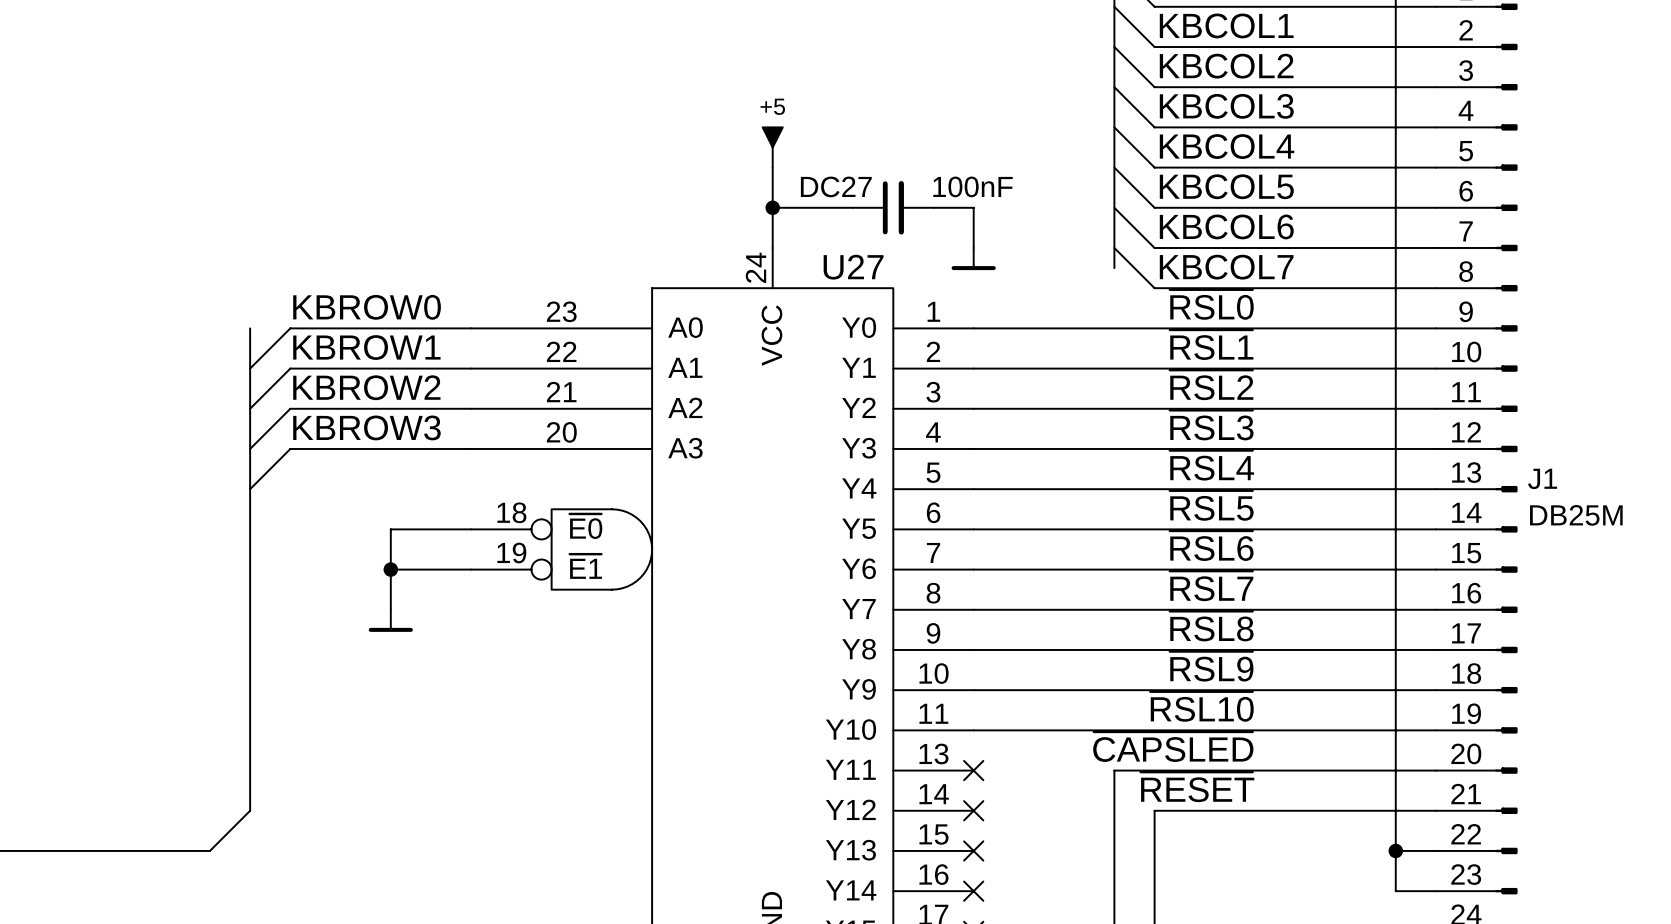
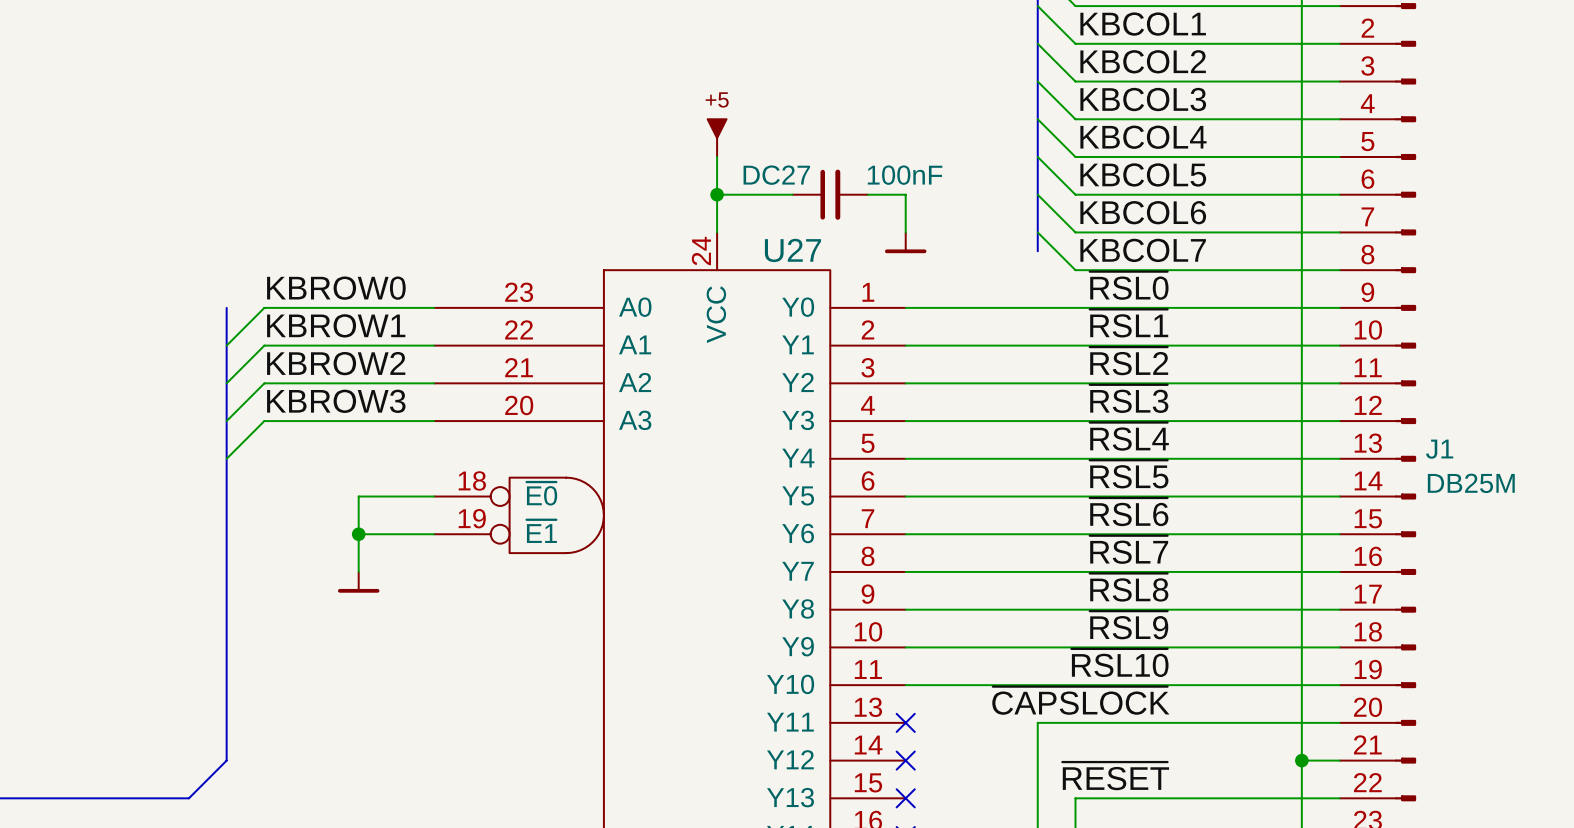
label: ~{CAPSLED} (1173, 746) -> ~{CAPSLOCK} (1080, 700)
label position: ~{RESET} (1197, 787) -> ~{RESET} (1115, 776)
wire: (1395, 810) (1154, 810) (1154, 850) -> (1301, 798) (1075, 798)
junction position: (1395, 850) -> (1301, 760)

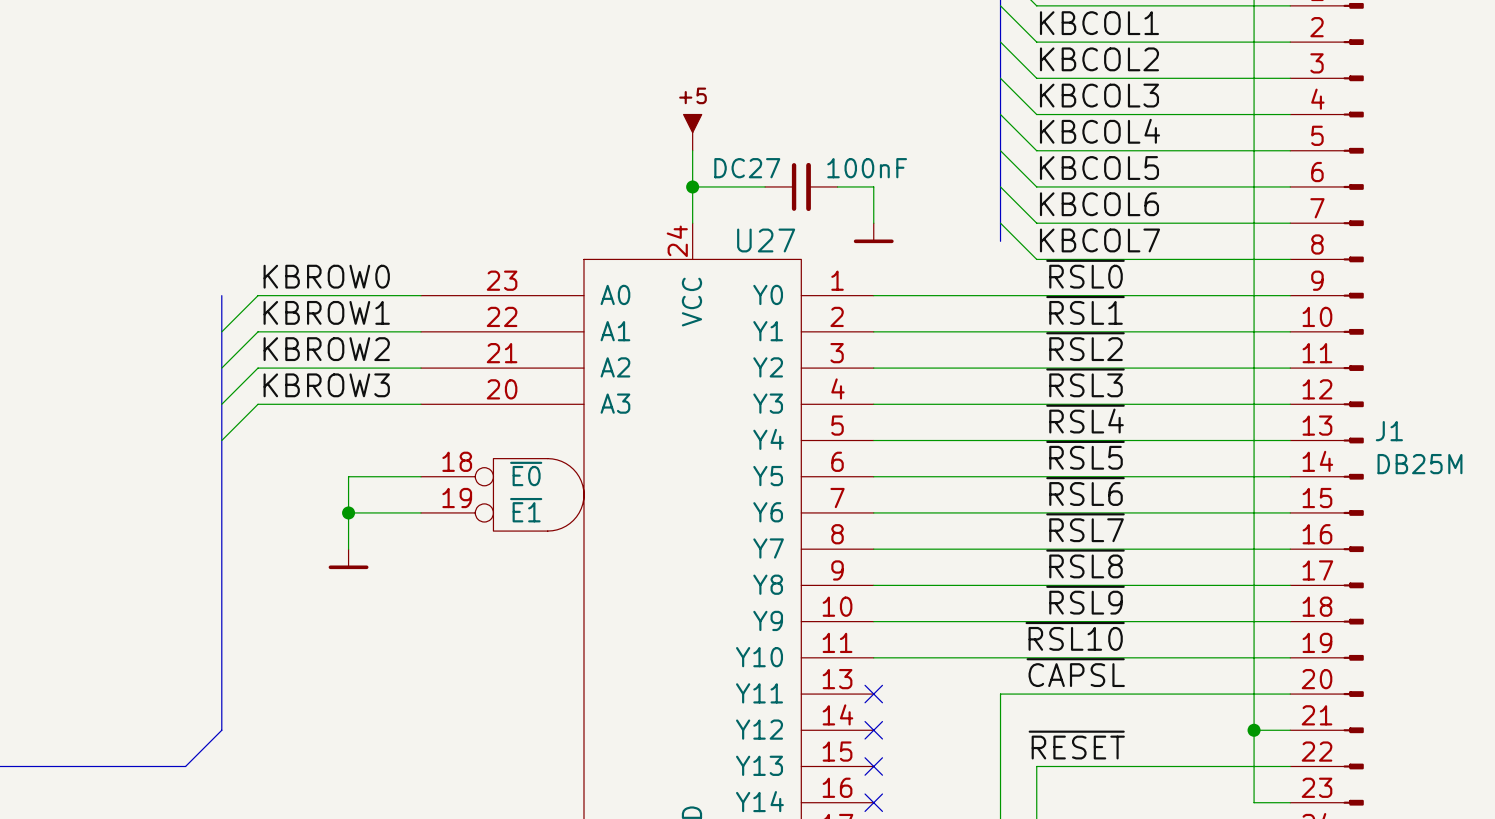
label: ~{CAPSLOCK} (1080, 700) -> ~{CAPSL} (1075, 672)

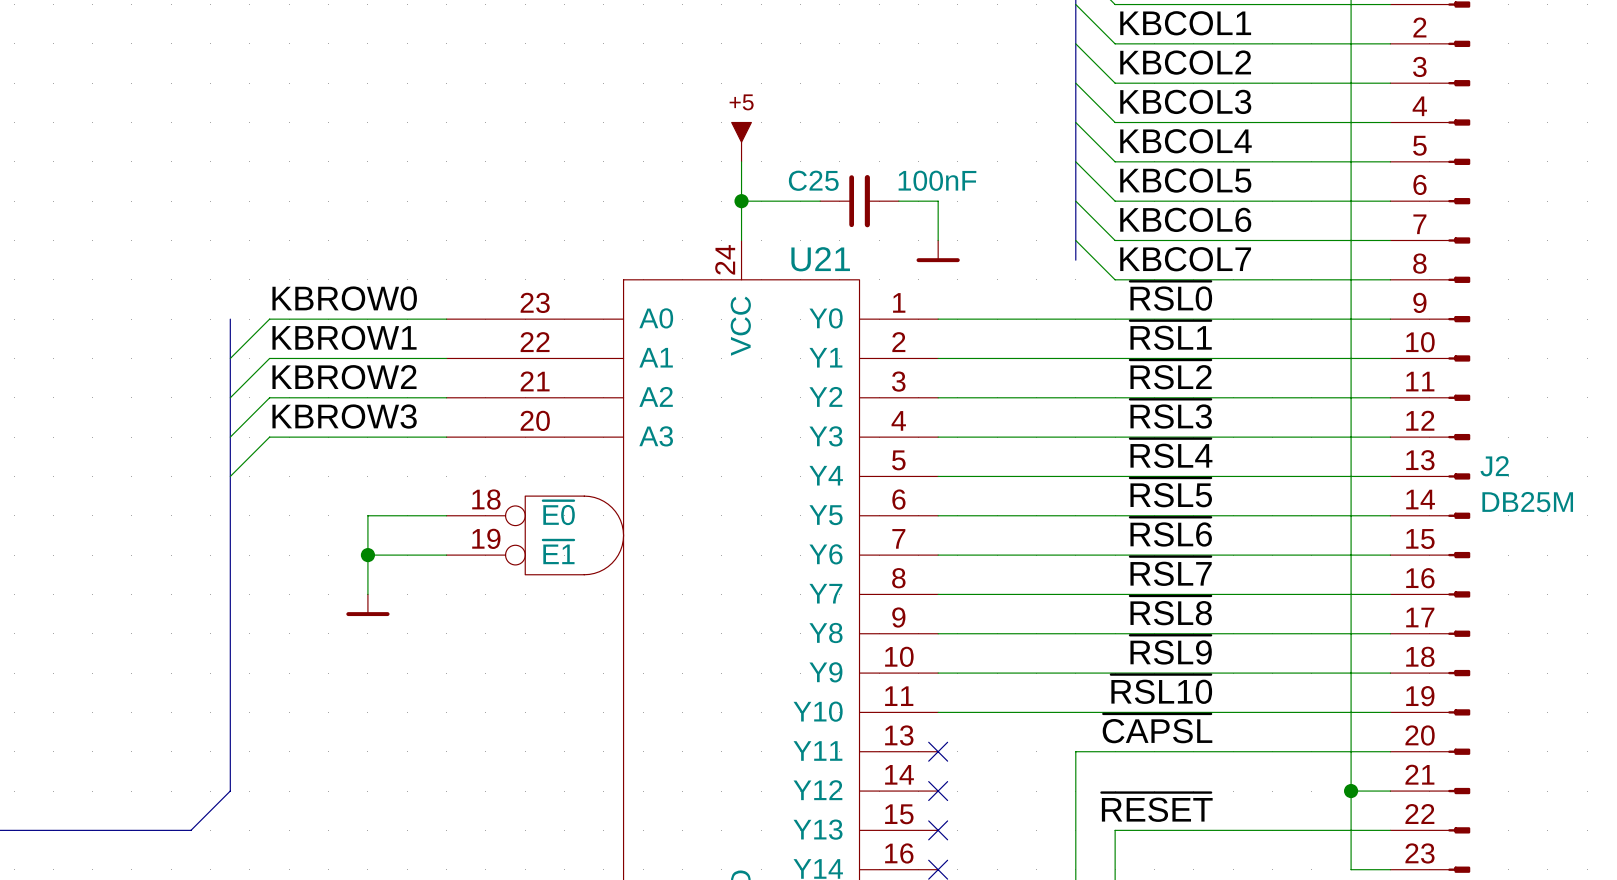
DC27 name: DC27 (747, 168) -> C25 (813, 180)
U27 name: U27 (766, 240) -> U21 (820, 259)
J1 name: J1 (1389, 431) -> J2 (1494, 466)

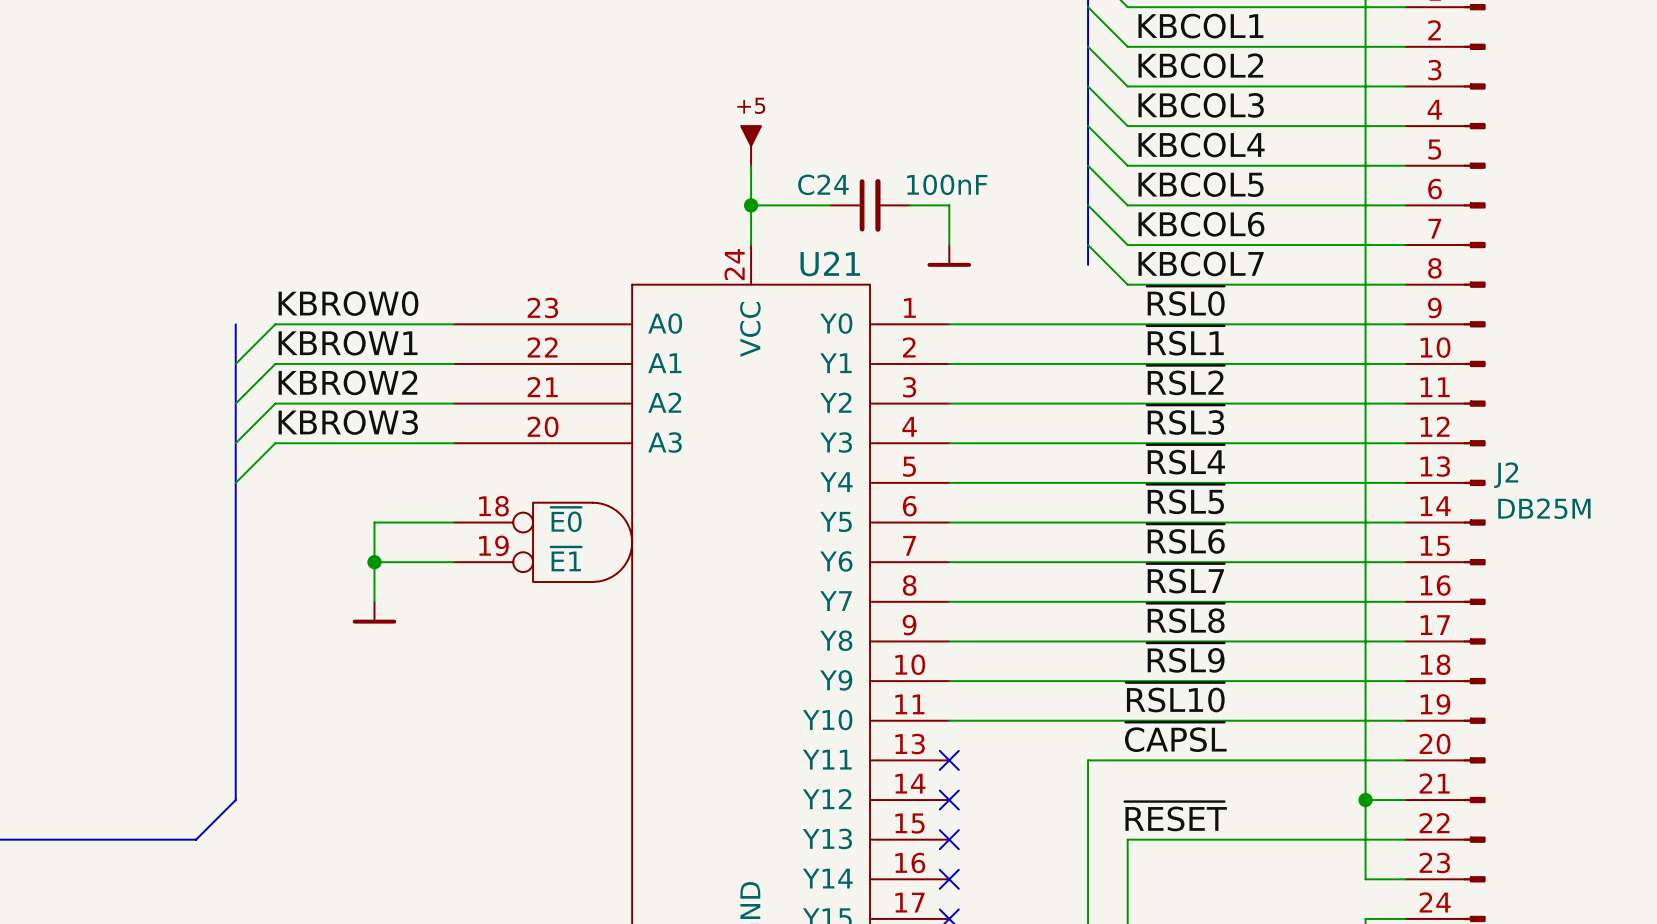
C25 name: C25 (813, 180) -> C24 (823, 184)

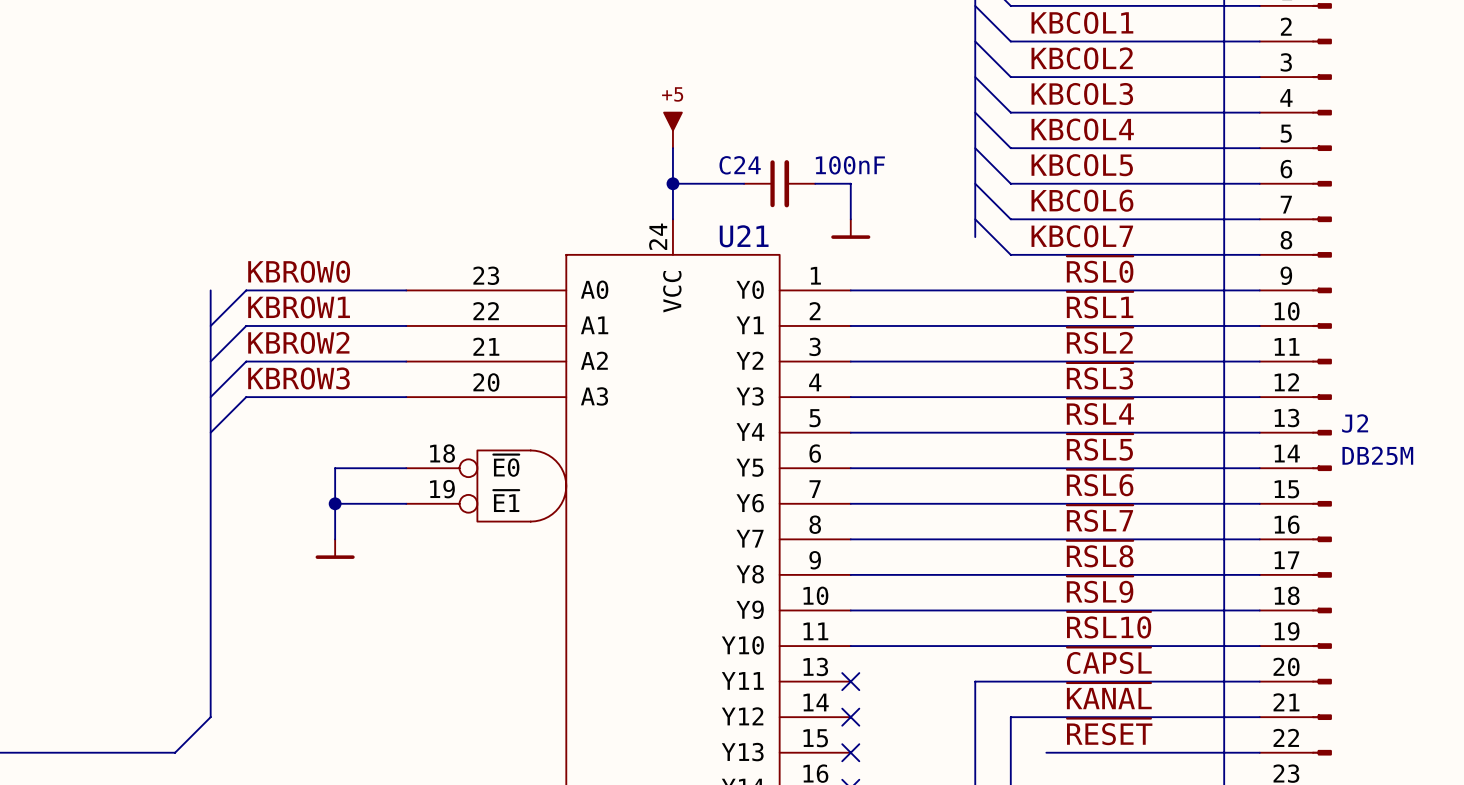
label position: ~{RSL0} (1185, 301) -> ~{RSL0} (1100, 269)
label position: ~{RSL1} (1185, 340) -> ~{RSL1} (1100, 305)
label position: ~{RSL2} (1185, 380) -> ~{RSL2} (1099, 340)
label position: ~{RSL3} (1185, 419) -> ~{RSL3} (1099, 376)
label position: ~{RSL4} (1185, 459) -> ~{RSL4} (1100, 411)
label position: ~{RSL5} (1185, 499) -> ~{RSL5} (1099, 447)
label position: ~{RSL6} (1185, 538) -> ~{RSL6} (1100, 482)
label position: ~{RSL7} (1185, 578) -> ~{RSL7} (1099, 518)
label position: ~{RSL8} (1185, 618) -> ~{RSL8} (1100, 554)
label position: ~{RSL9} (1185, 657) -> ~{RSL9} (1100, 589)
label position: ~{RSL10} (1175, 697) -> ~{RSL10} (1109, 625)
label position: ~{CAPSL} (1175, 737) -> ~{CAPSL} (1109, 660)
label: none -> ~{KANAL} (1109, 696)
junction: (1365, 800) -> none
label position: ~{RESET} (1175, 816) -> ~{RESET} (1109, 731)
wire: (1127, 839) (1167, 839) -> (1010, 752) (1010, 717) (1224, 717)

